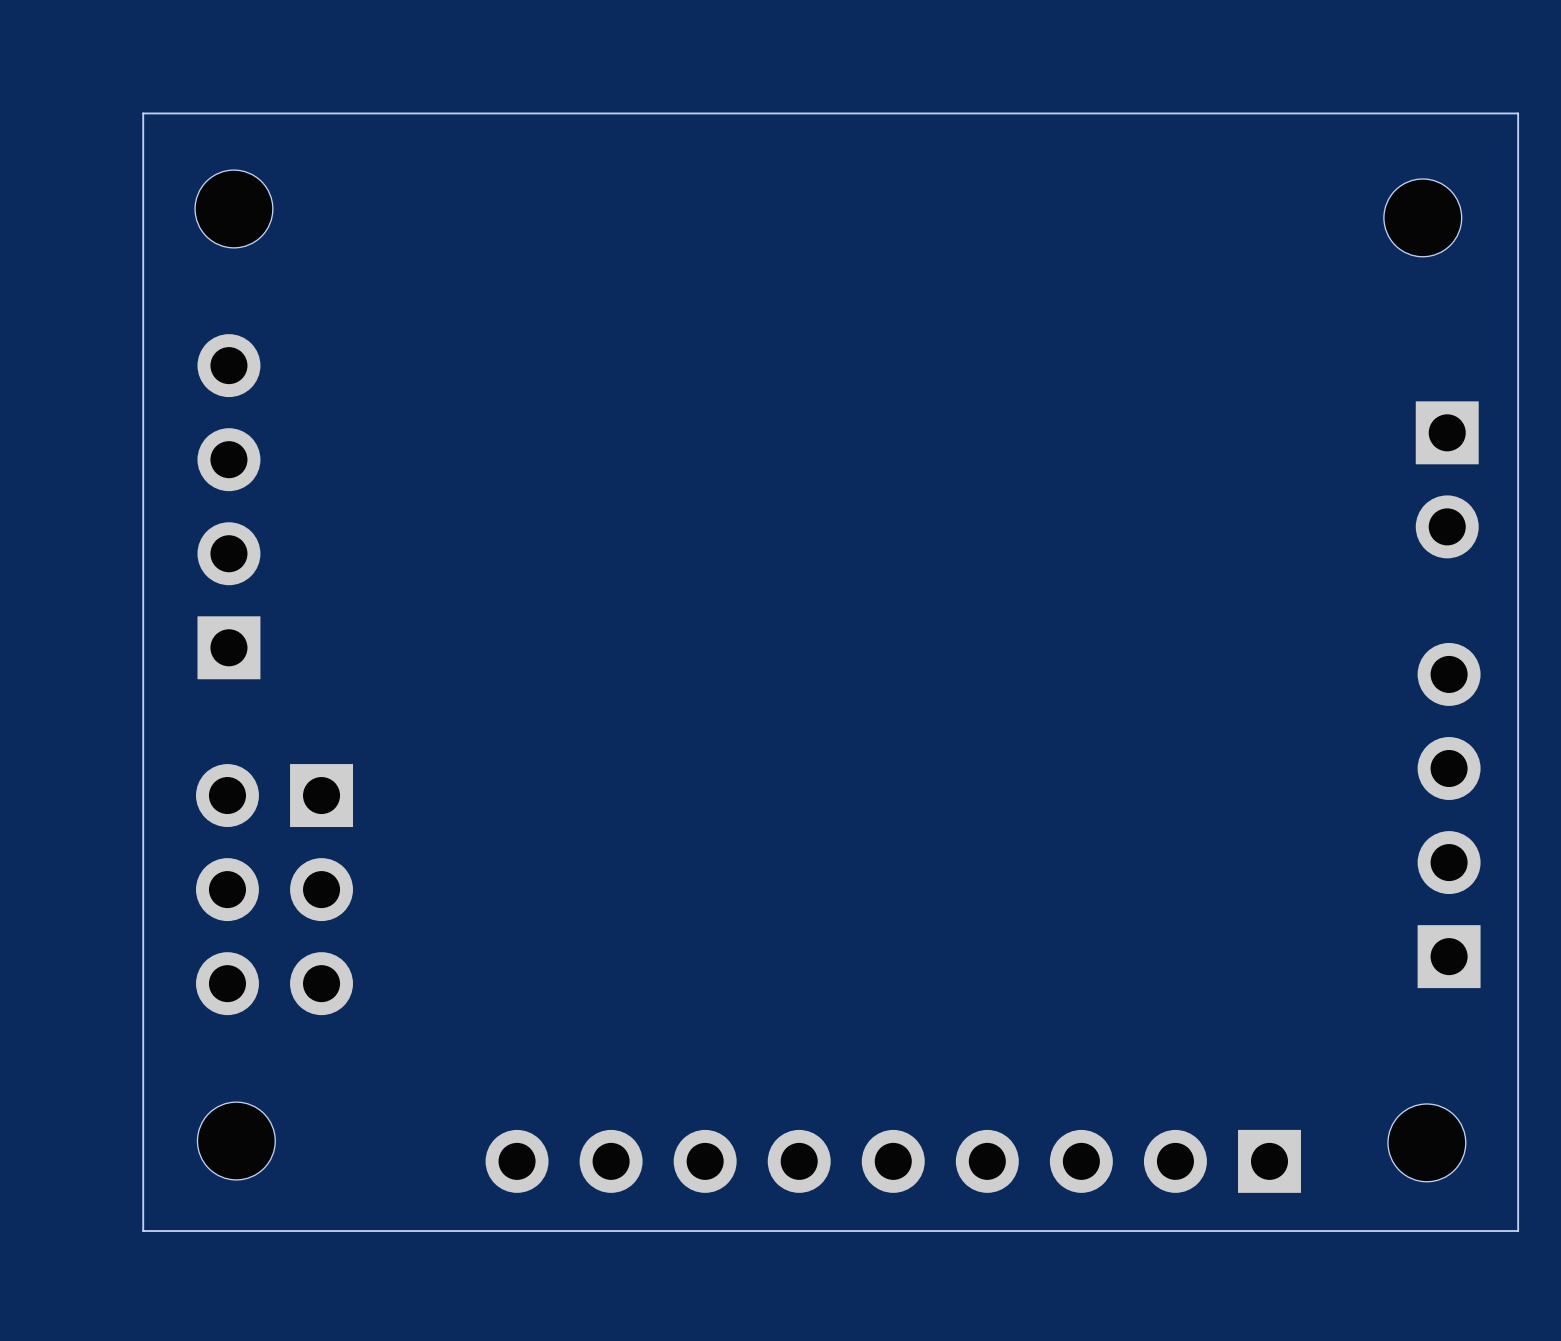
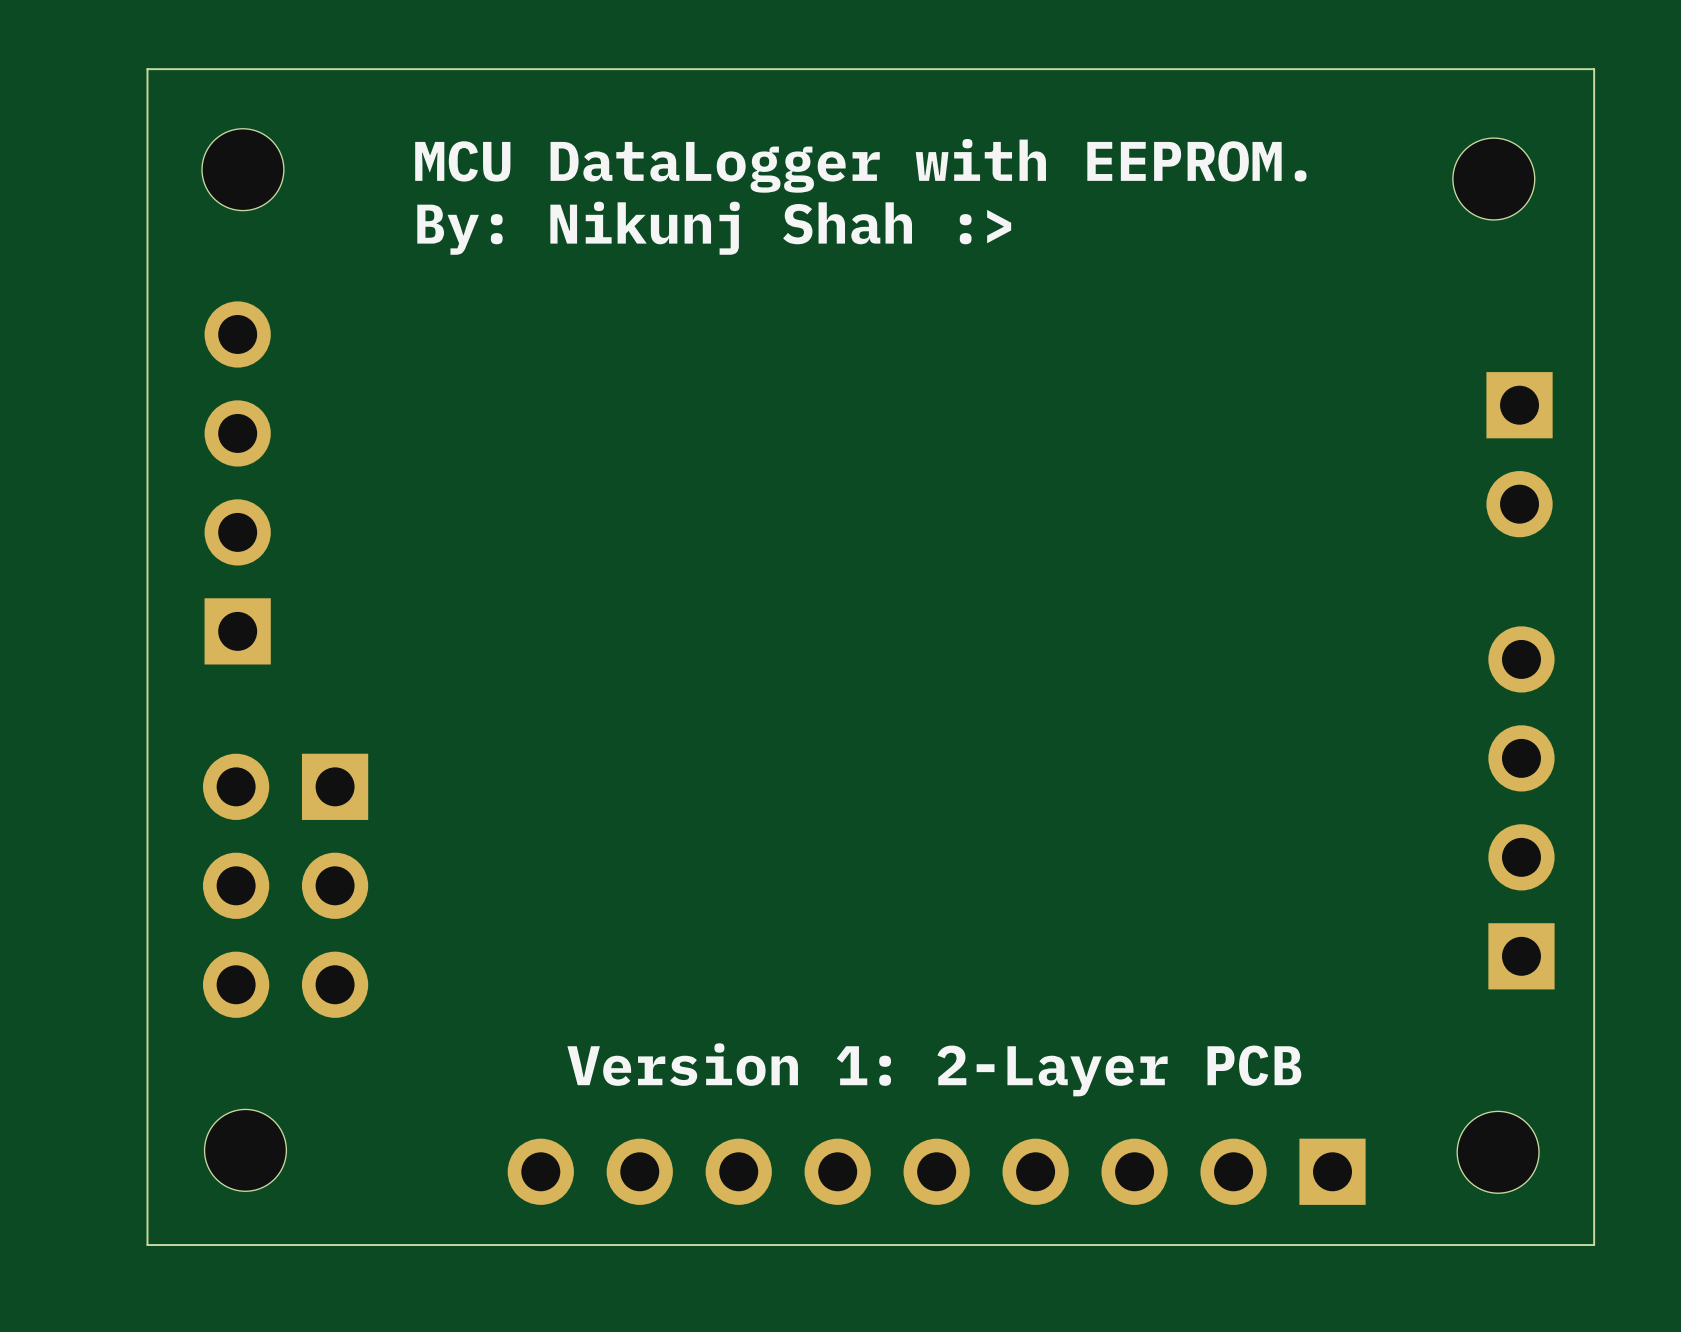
text: none -> MCU DataLogger with EEPROM. (860, 165)
text: none -> By: Nikunj Shah :> (714, 228)
text: none -> Version 1: 2-Layer PCB (934, 1069)

